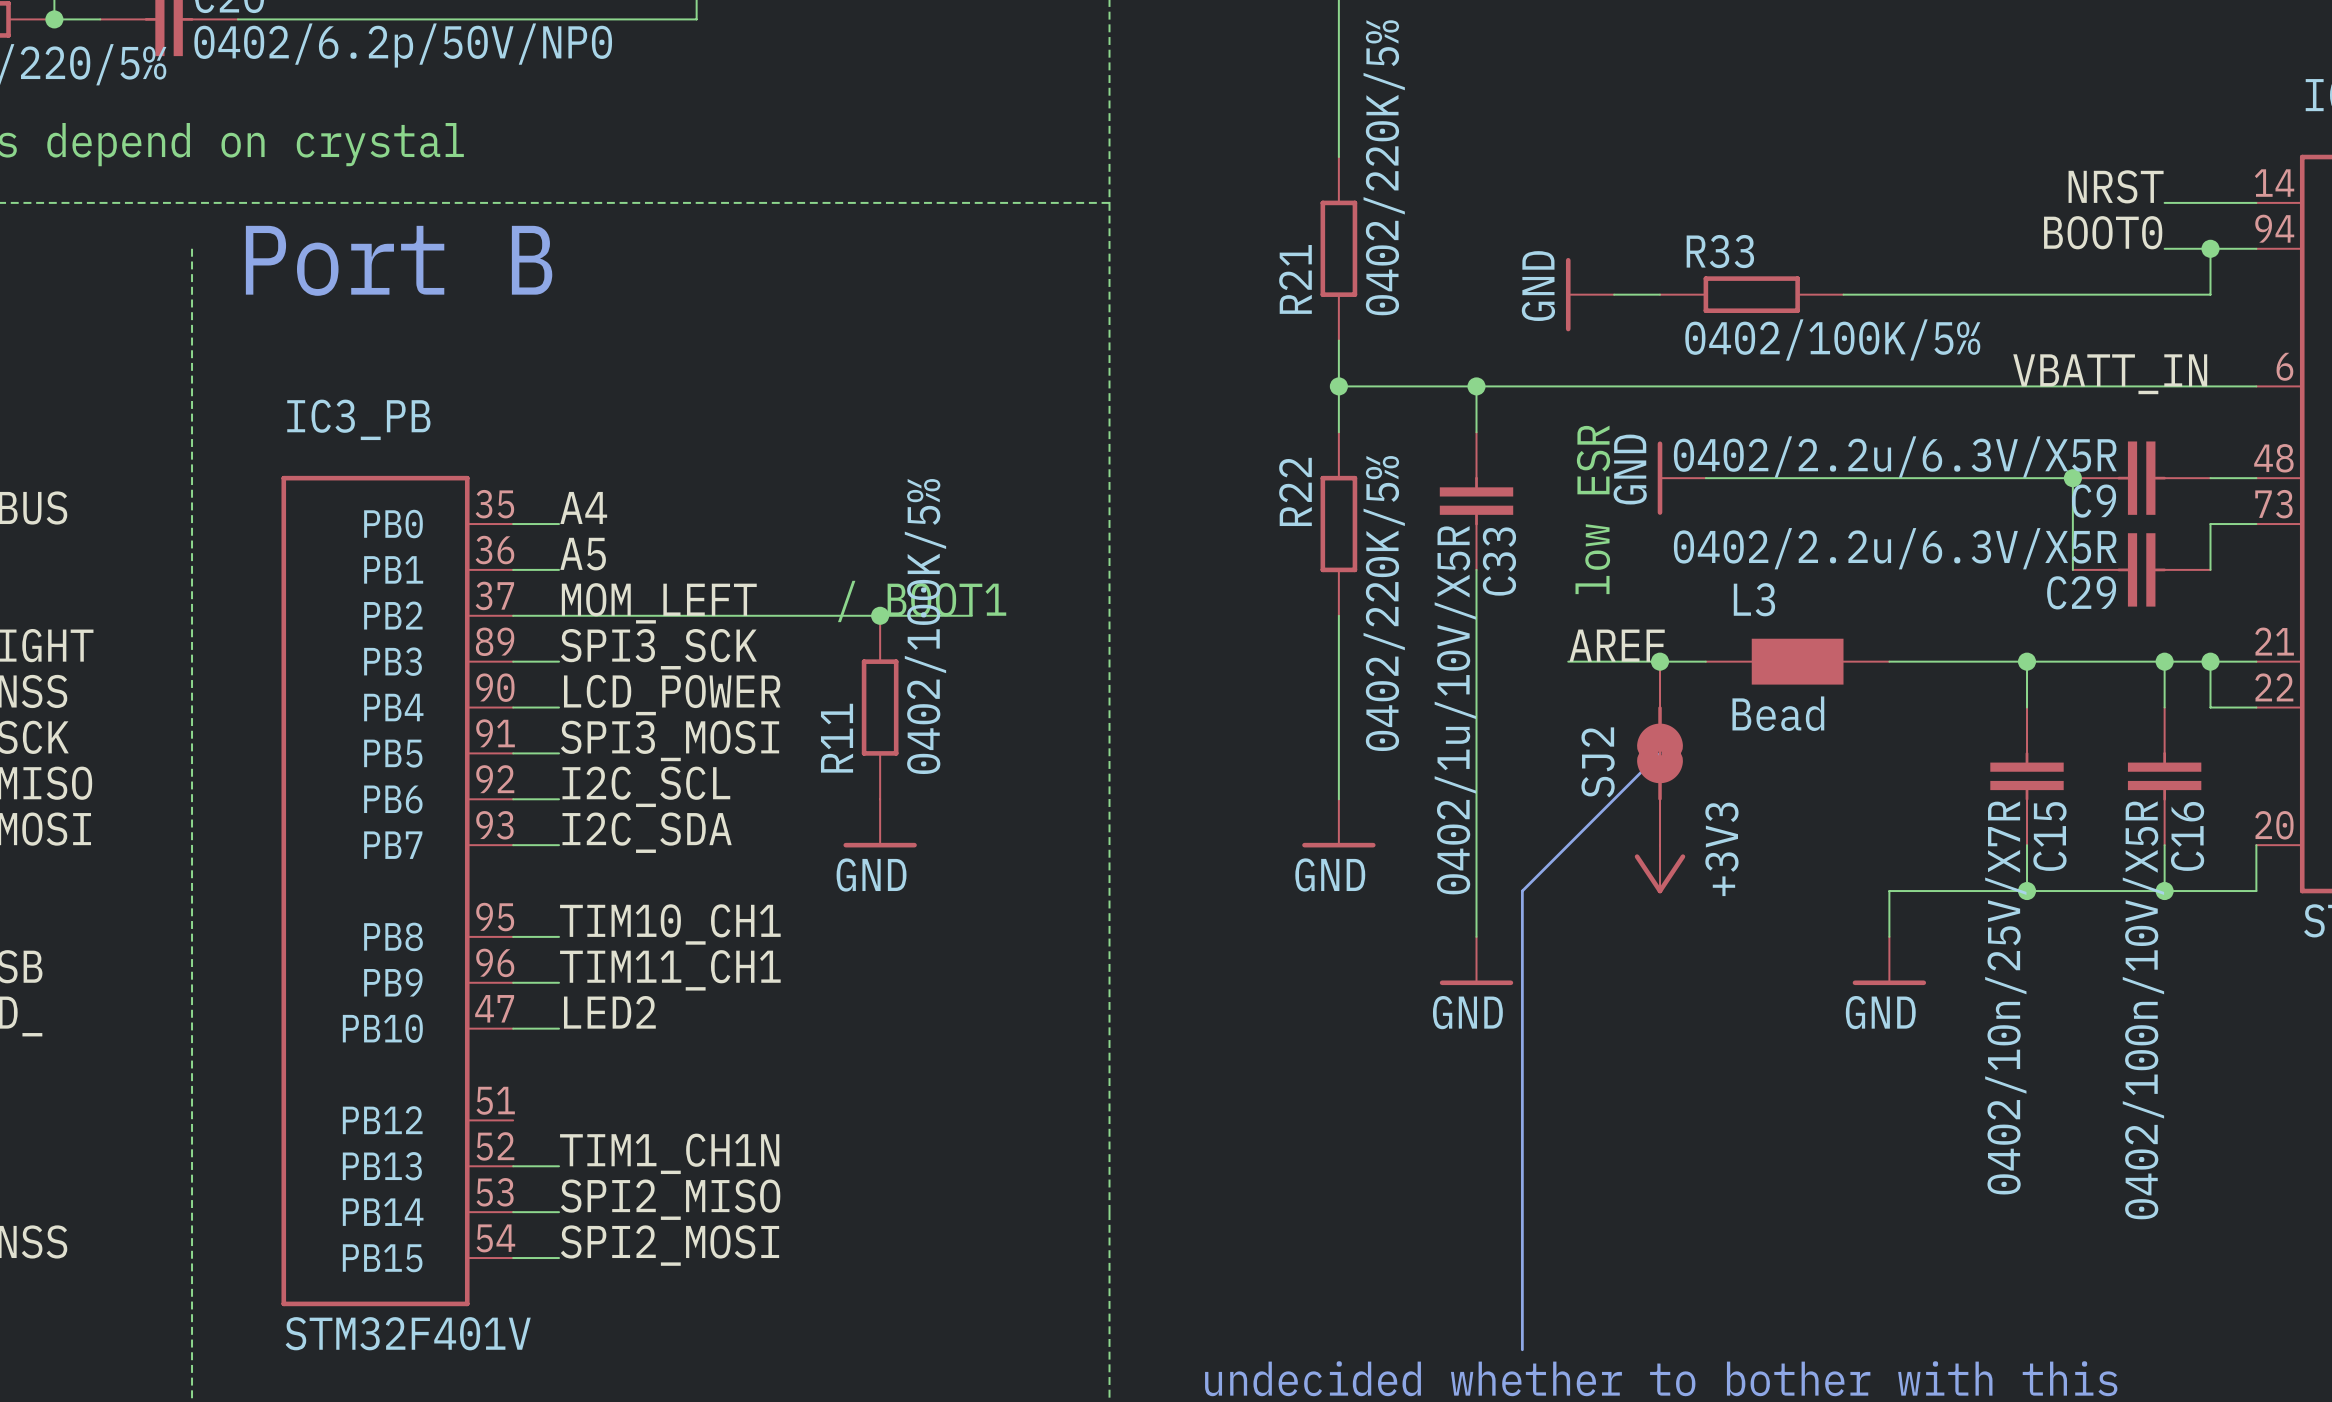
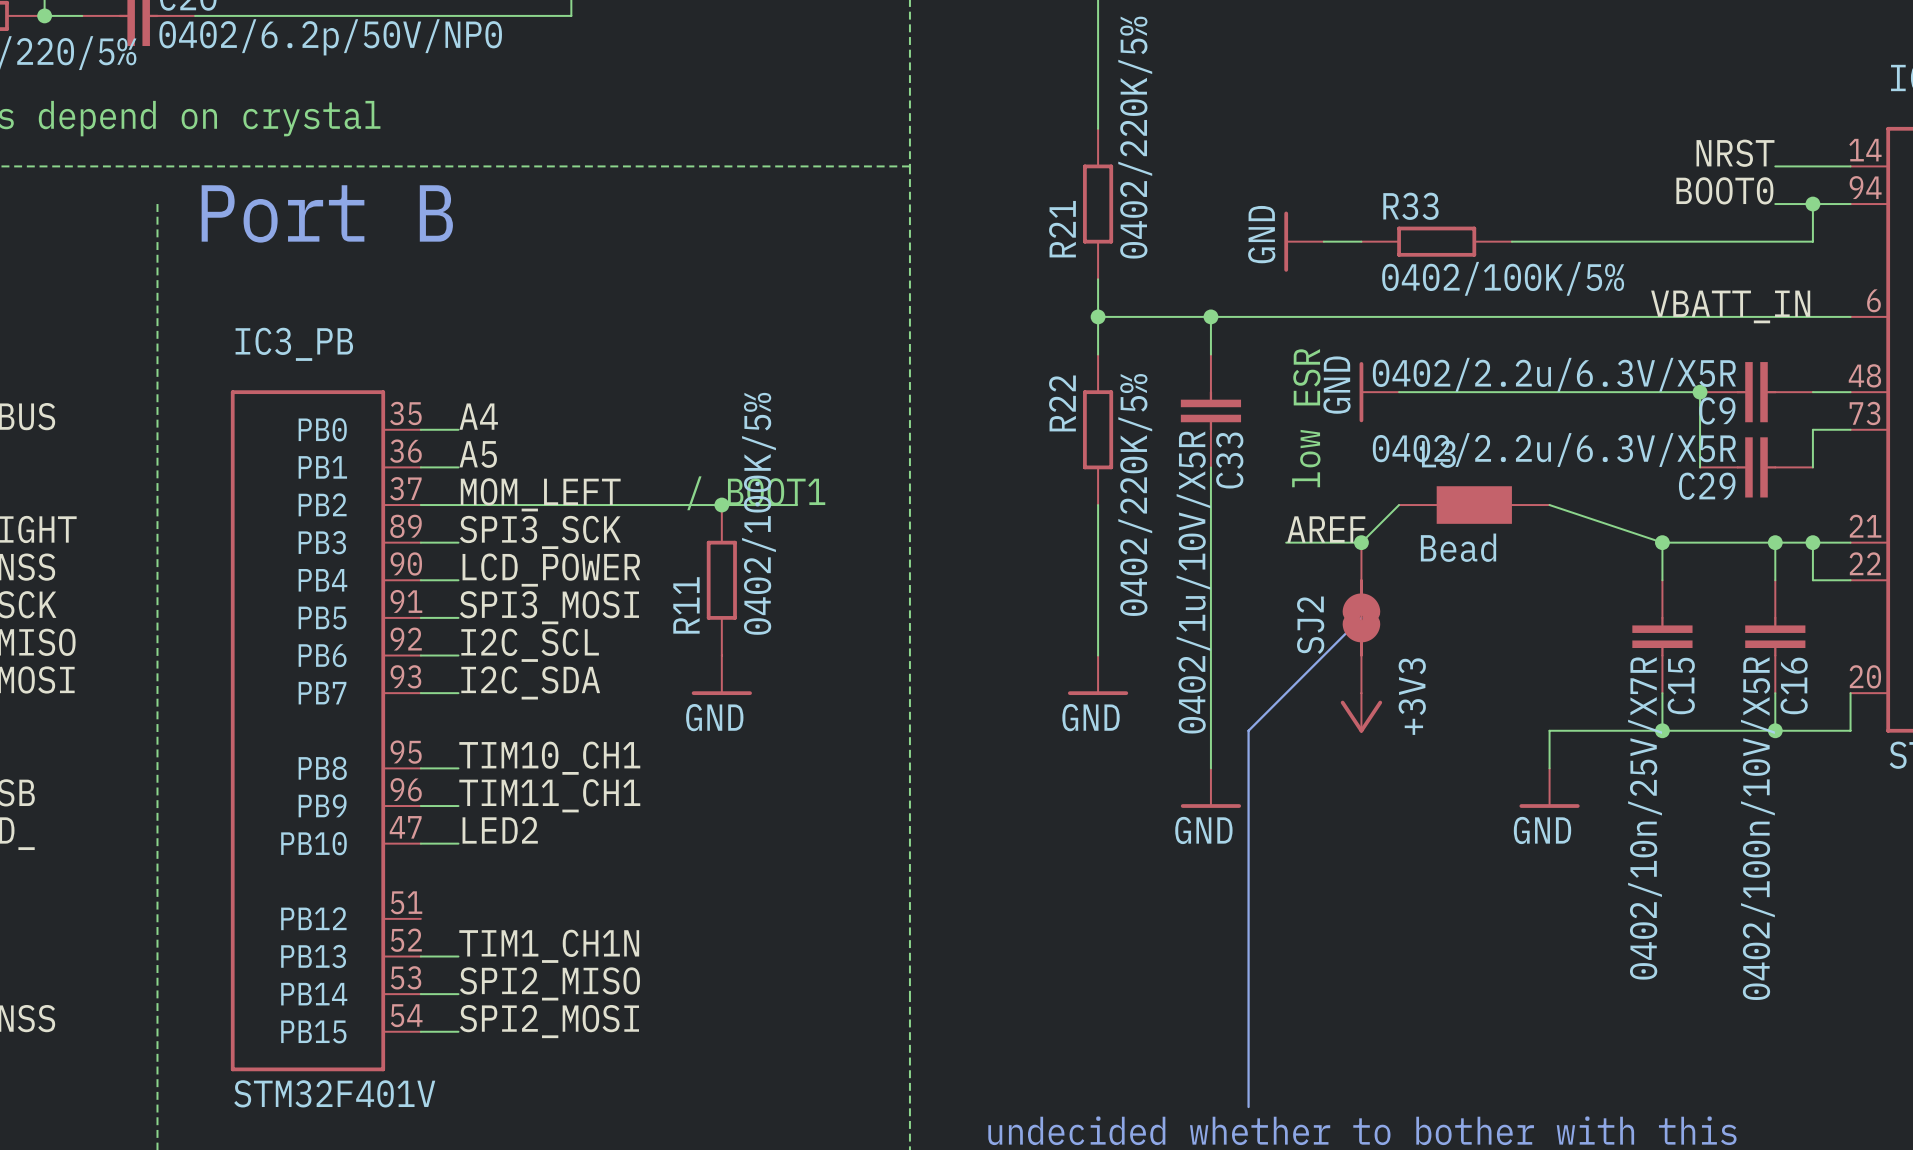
wire: (1660, 661) (1705, 661) -> (1361, 542) (1399, 505)
L3 position: (1797, 661) -> (1474, 505)
wire: (1889, 661) (2027, 661) -> (1549, 505) (1662, 542)

